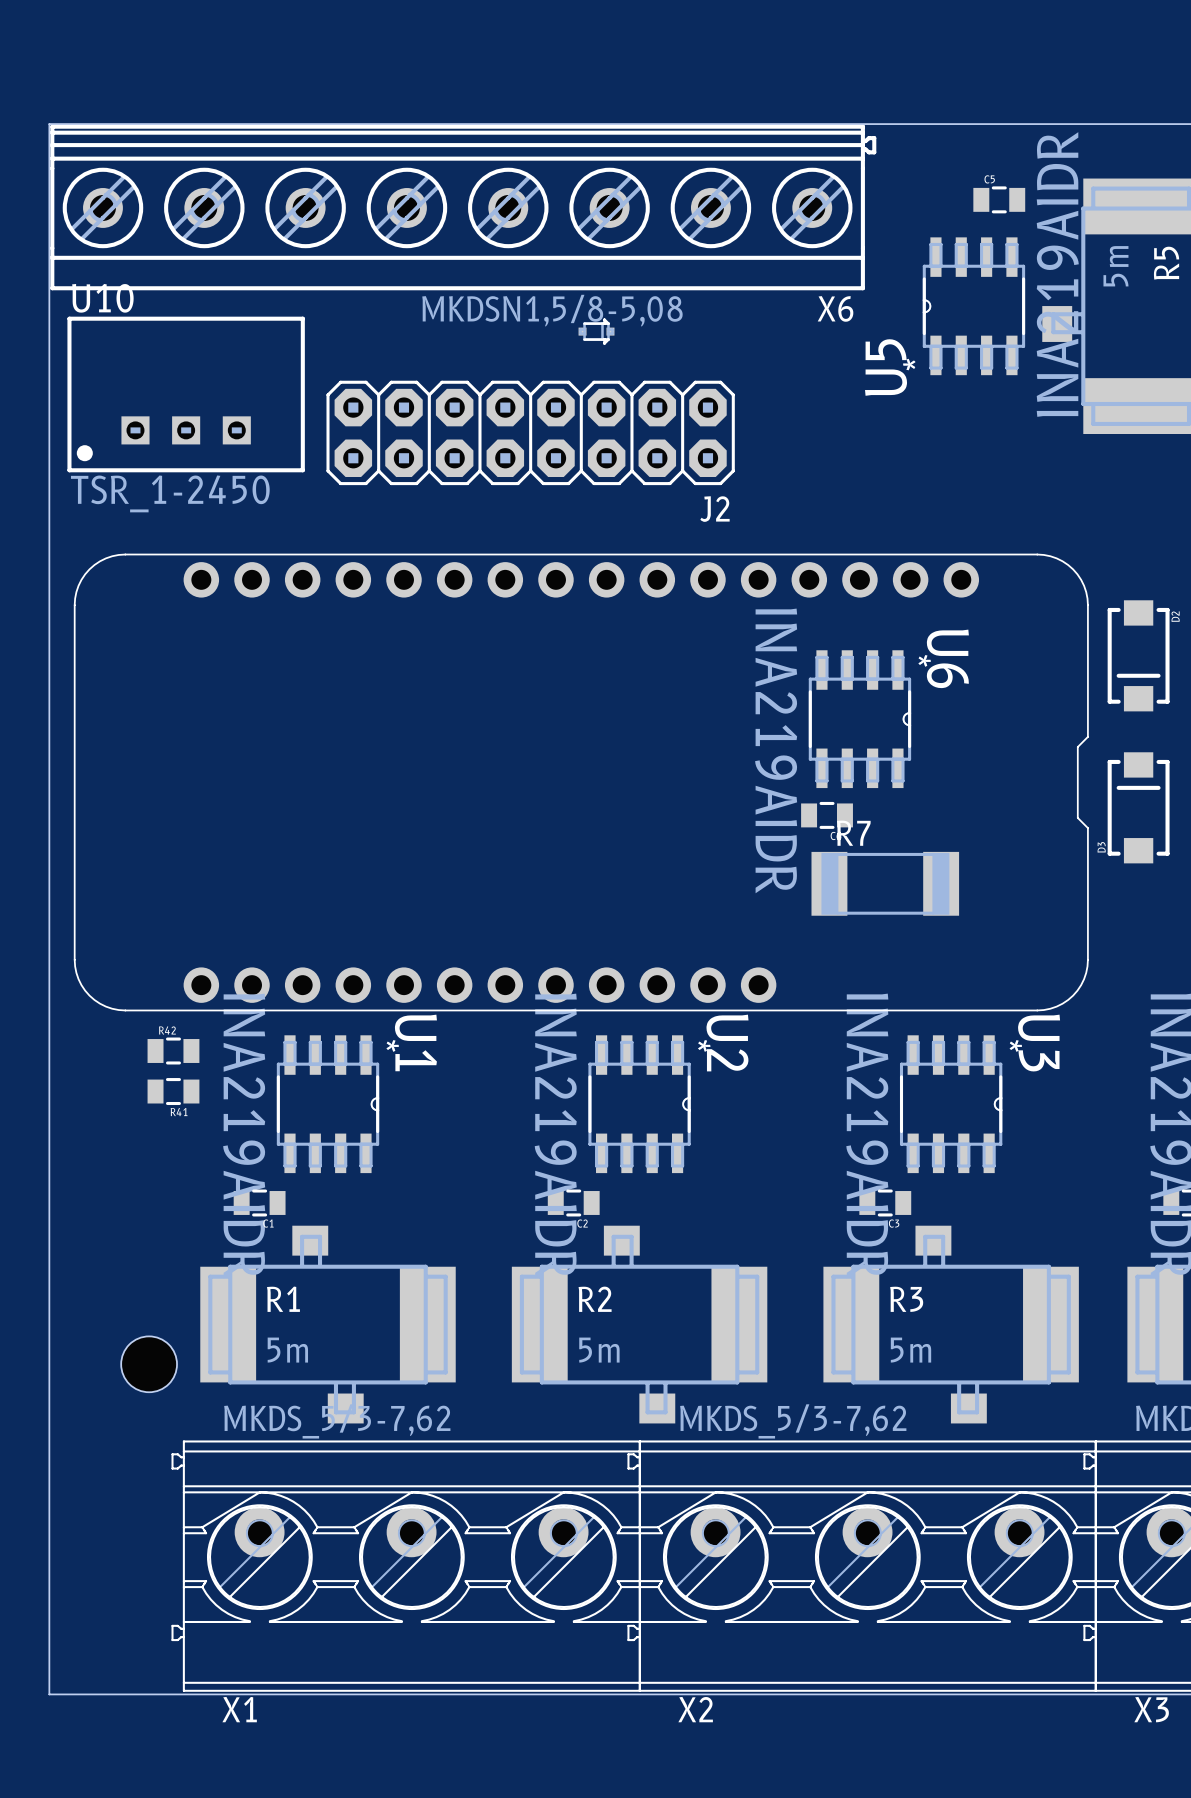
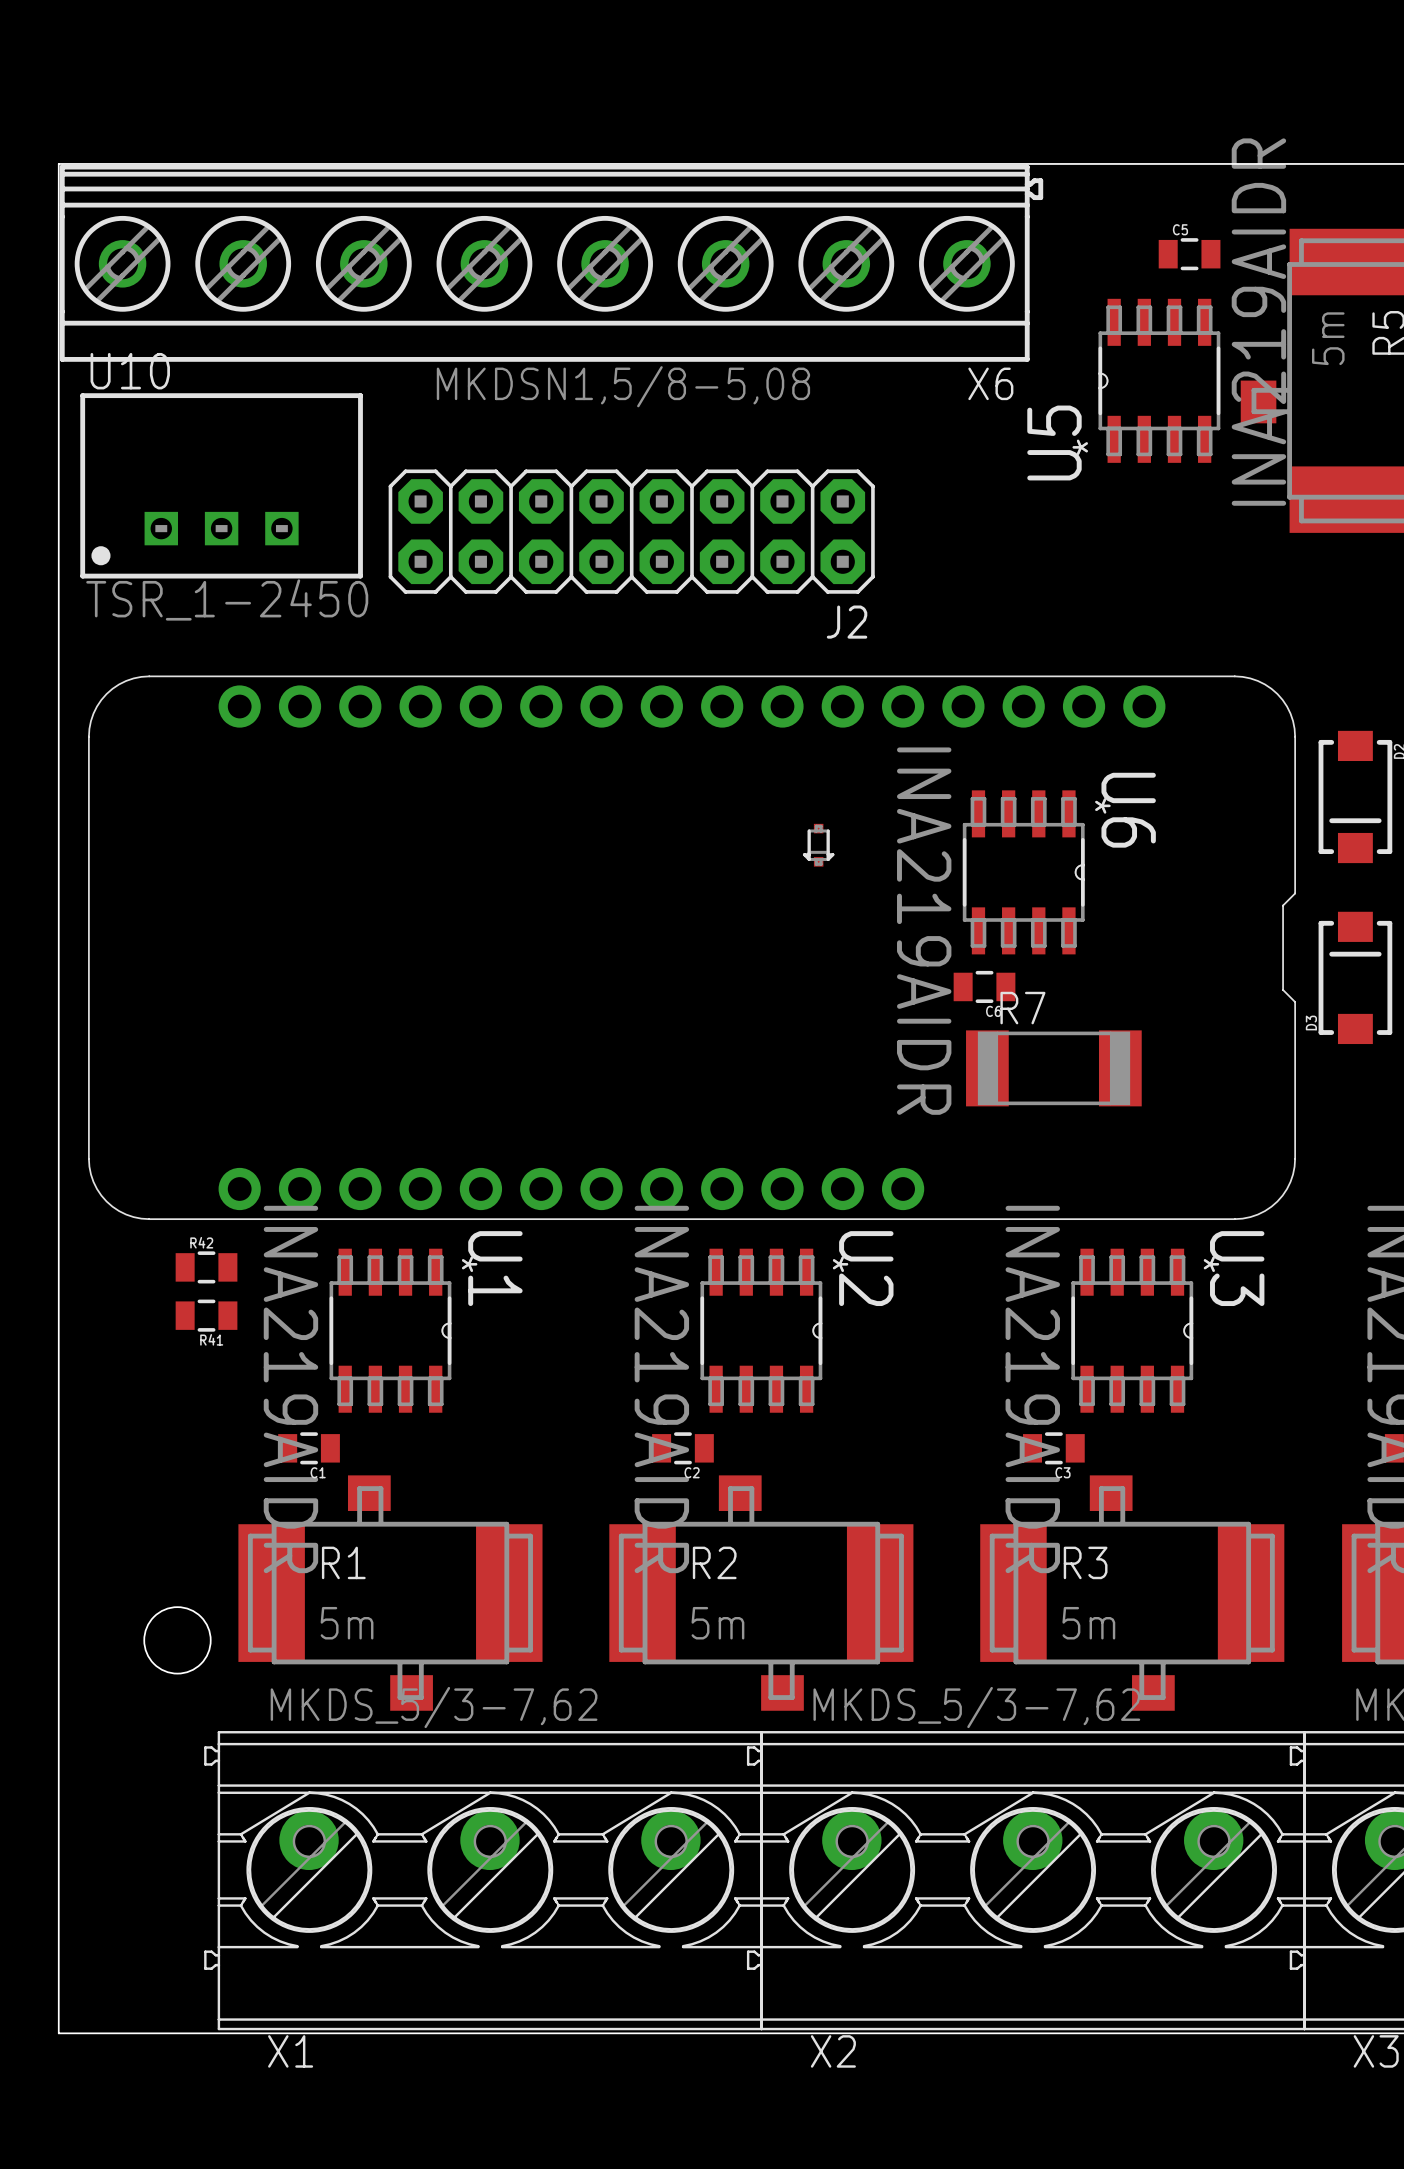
part rotation: 0° (596, 331) -> 90° clockwise (818, 845)
part position: (596, 331) -> (818, 845)

